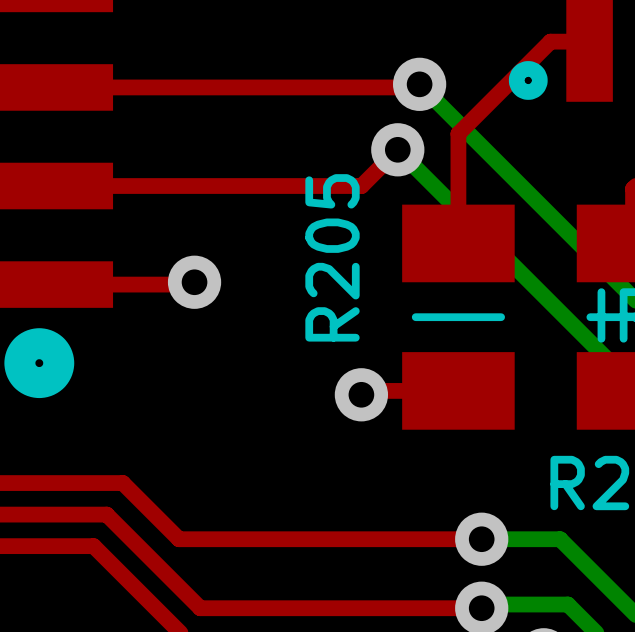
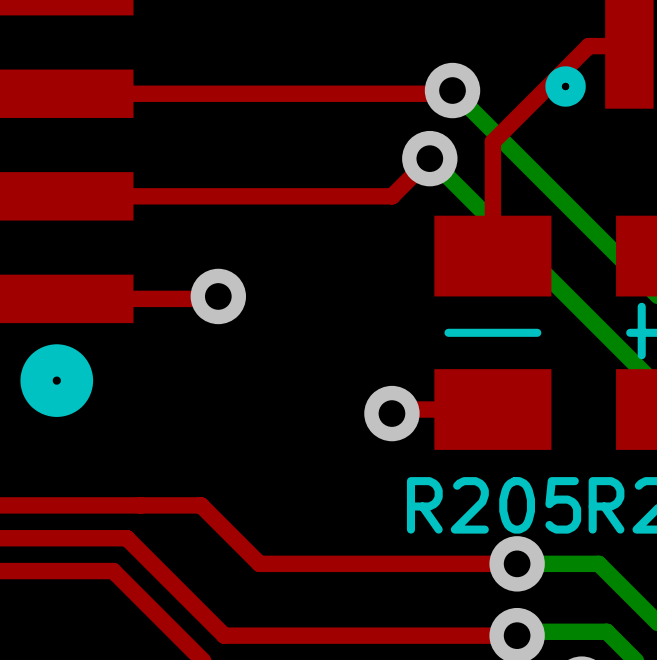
R205 name rotation: 0° (332, 257) -> 90° clockwise (494, 505)
R205 name position: R205 (332, 257) -> R205 (494, 505)
top track: (122, 483) (179, 539) (234, 539) -> (143, 505) (201, 505) (259, 563)

